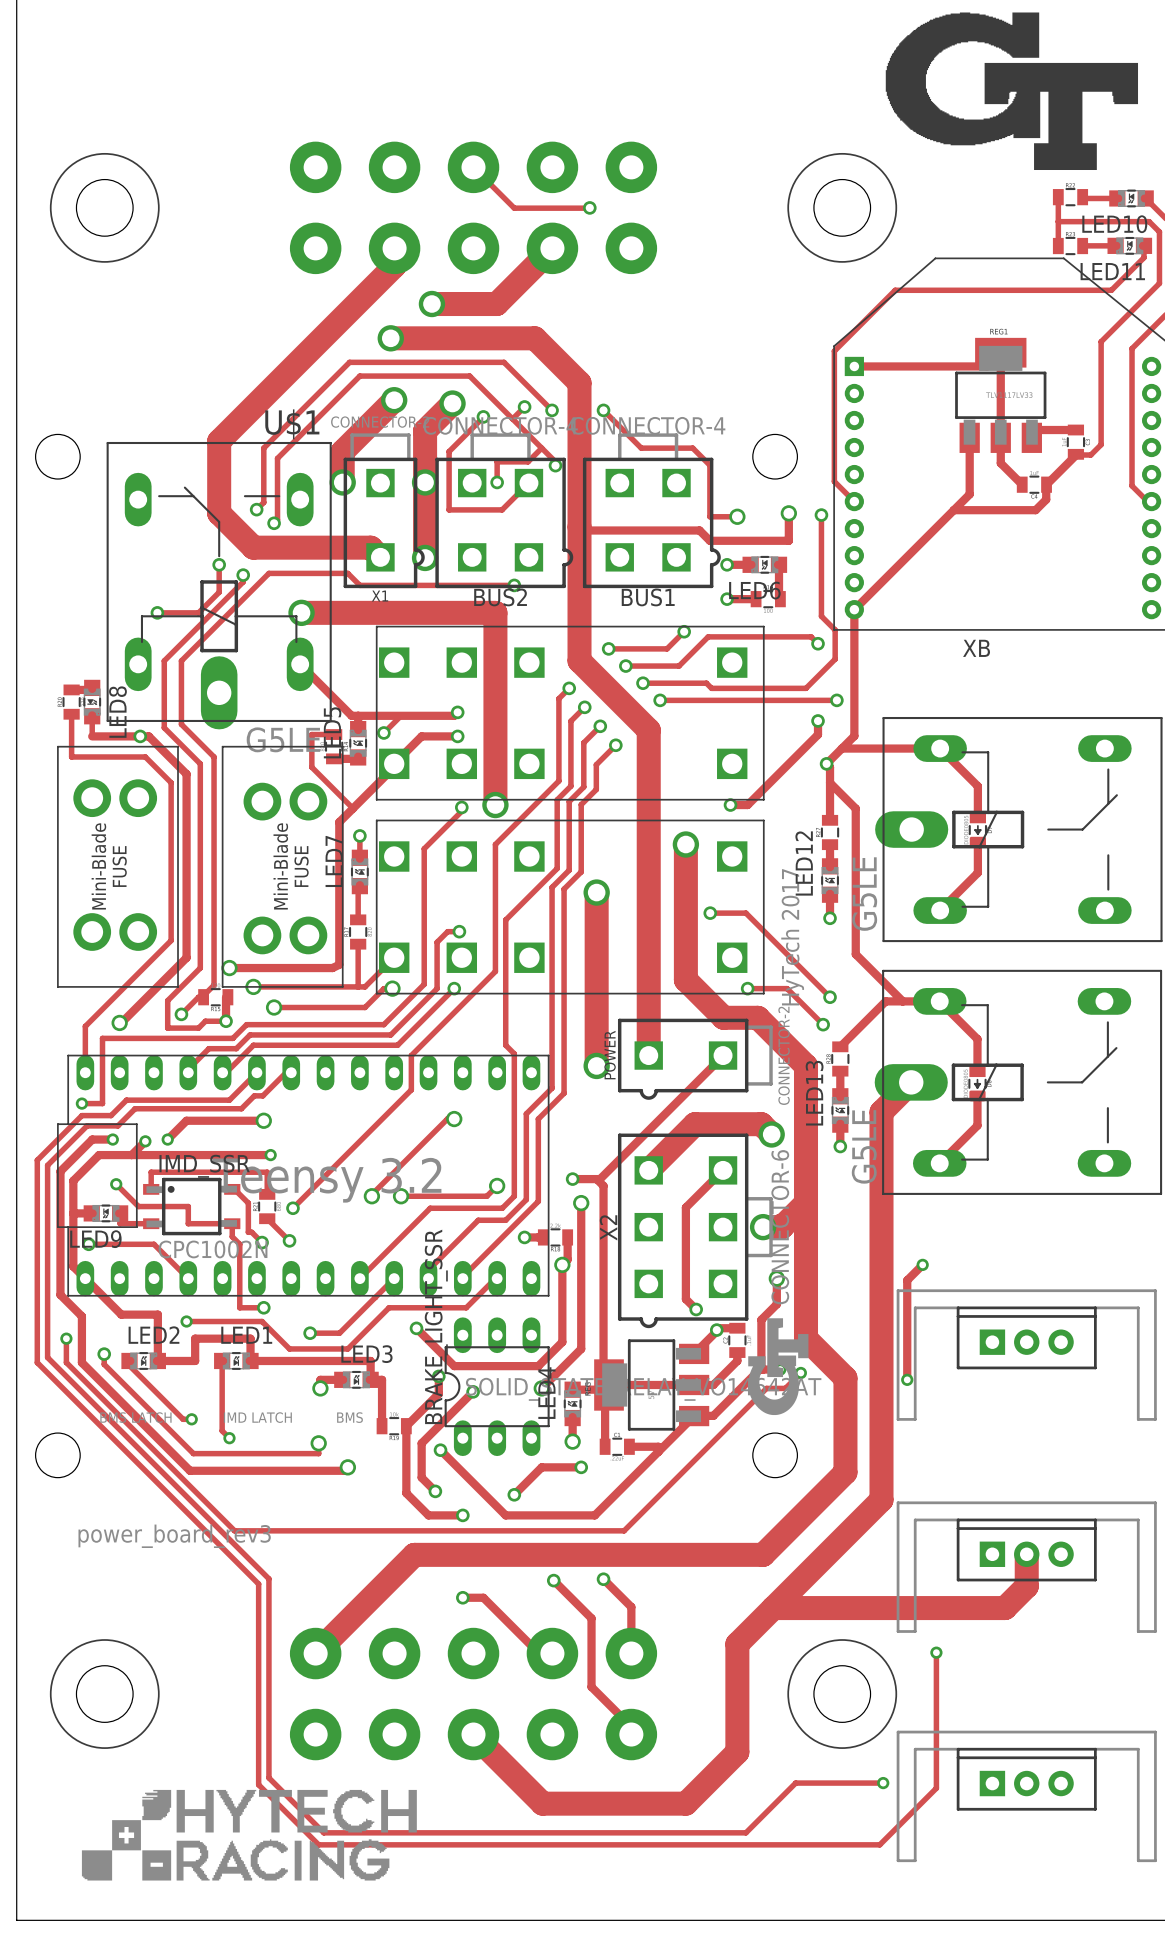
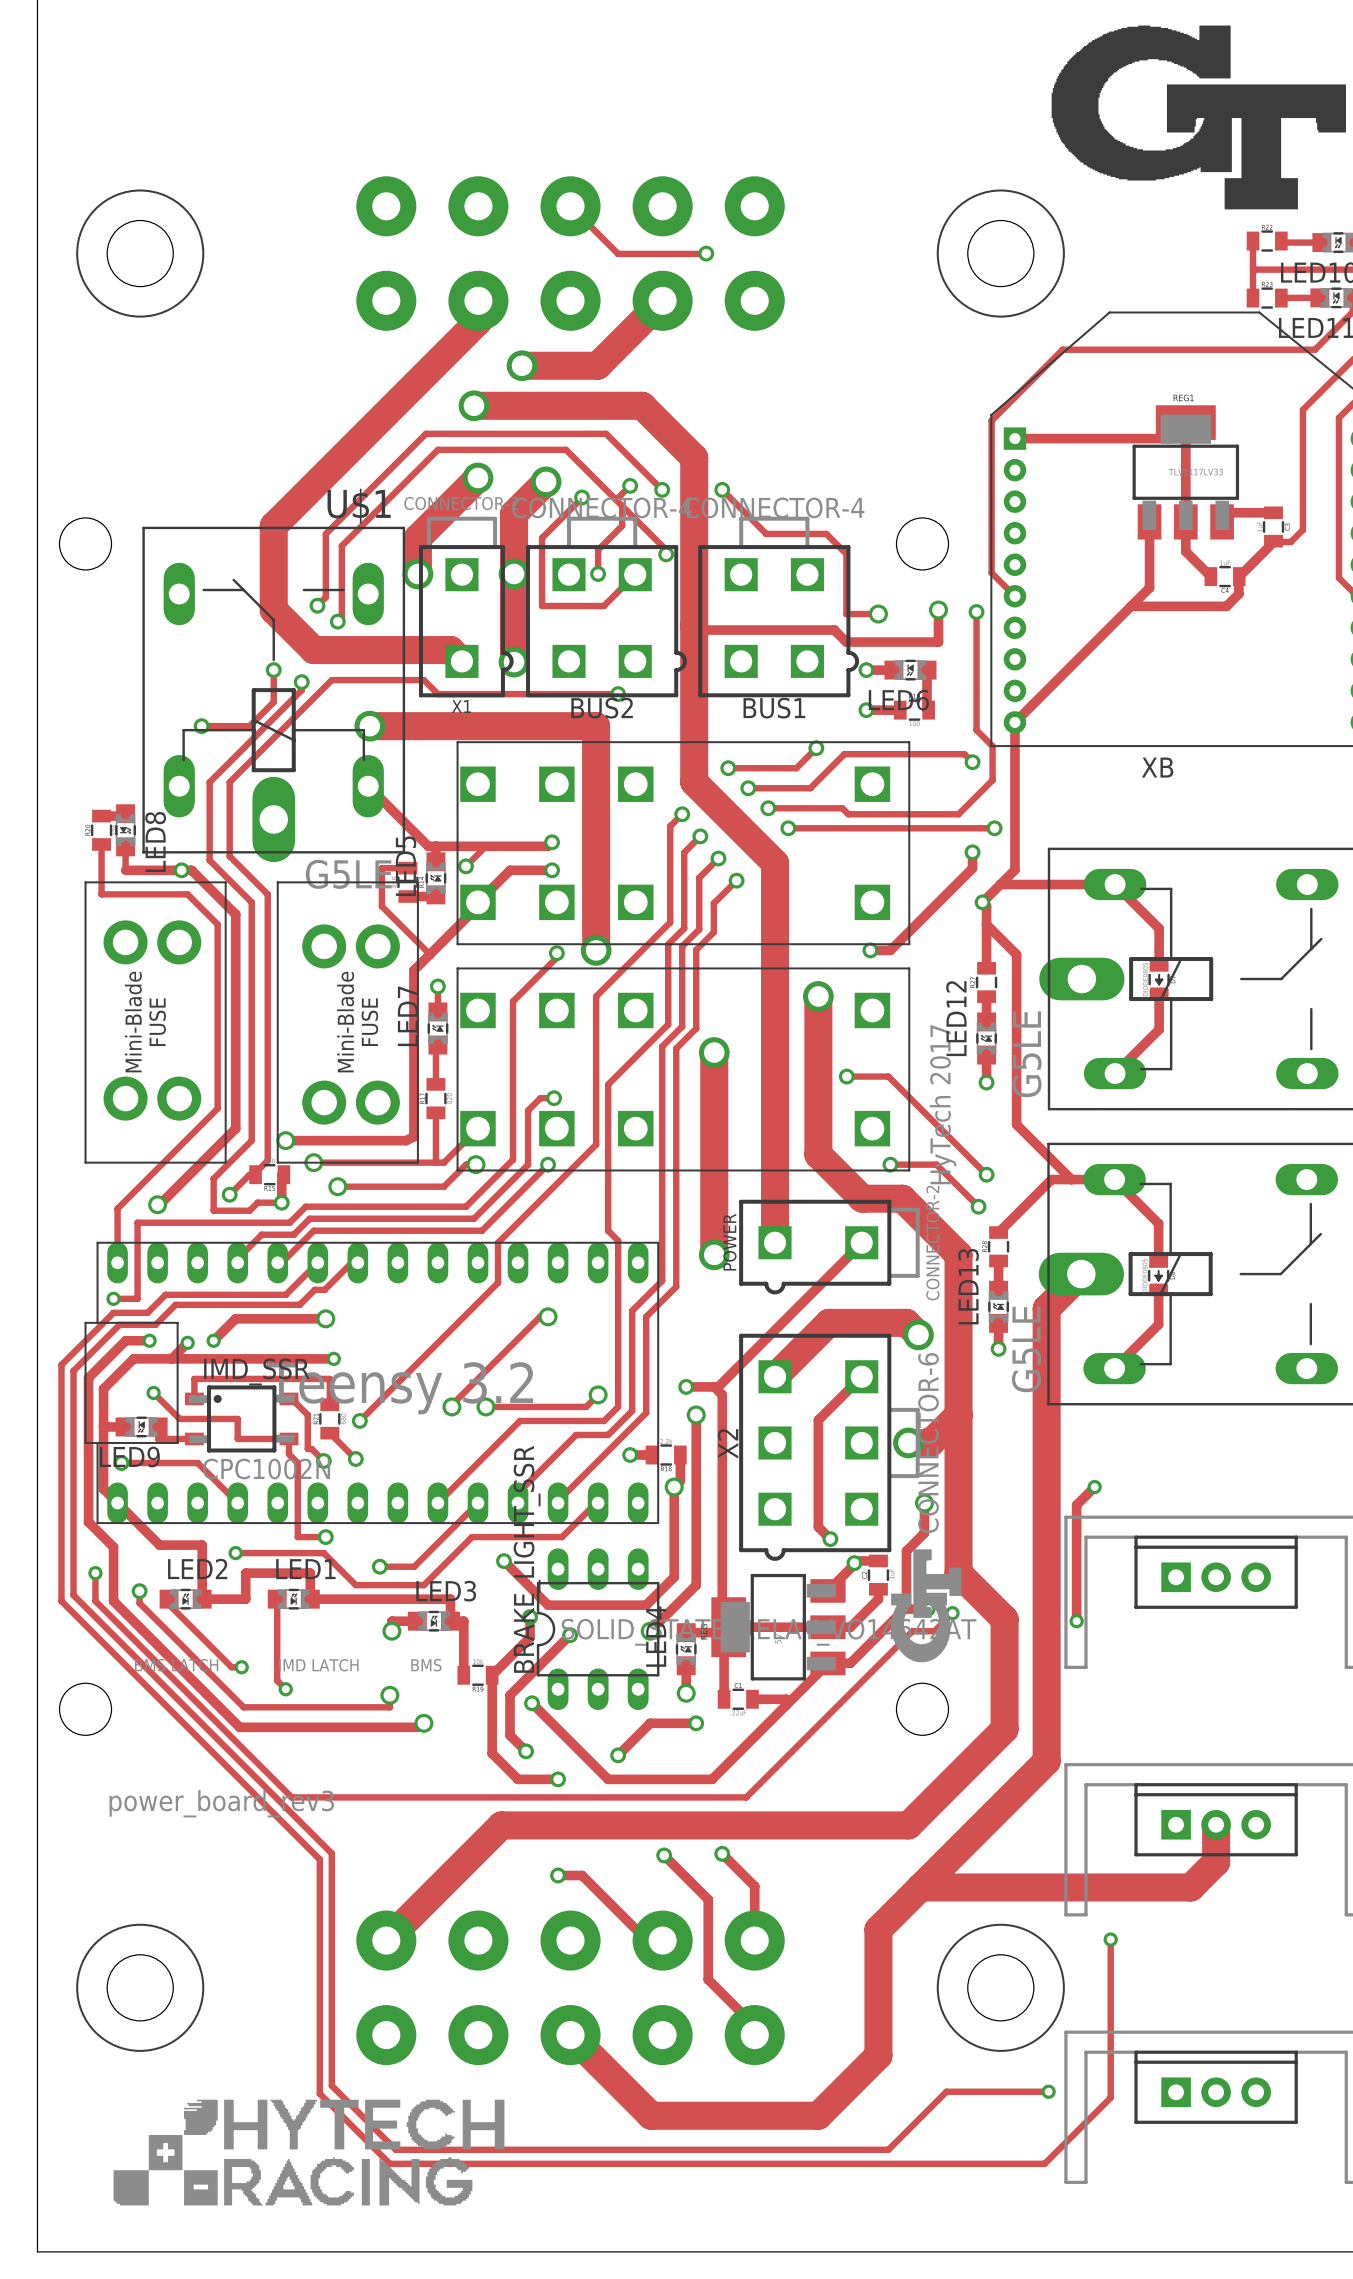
track: (541, 448) (528, 461) (497, 461) -> (622, 505) (622, 525) (598, 549)

